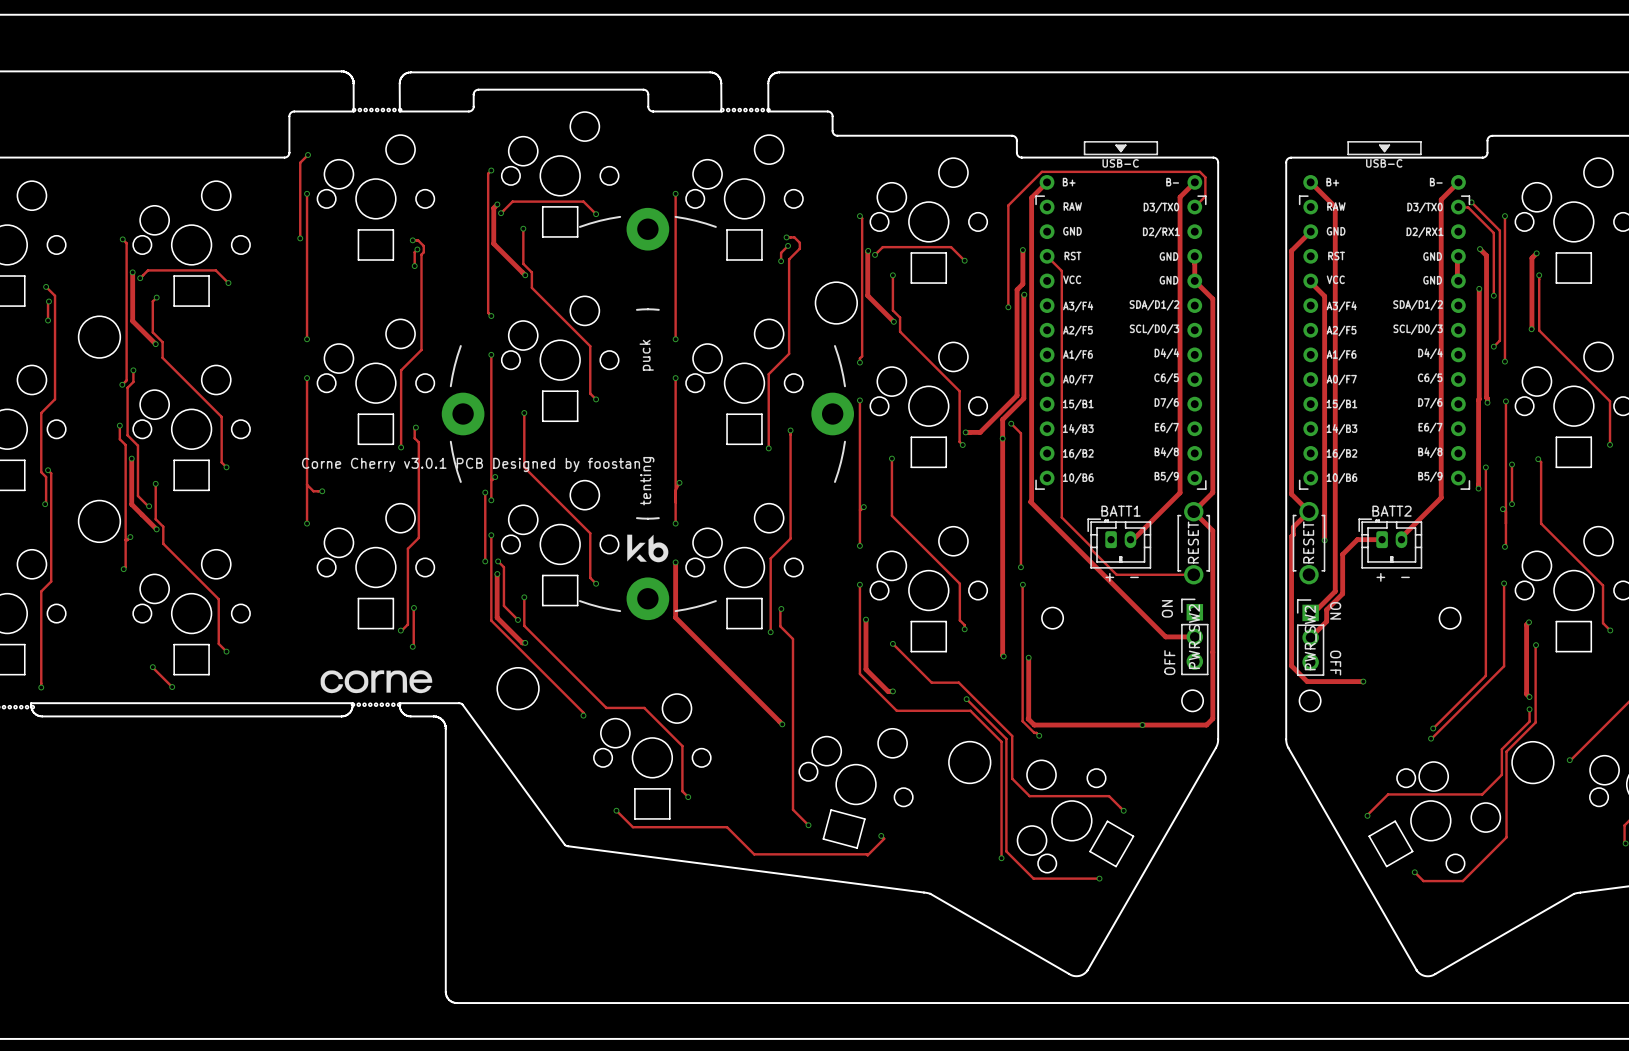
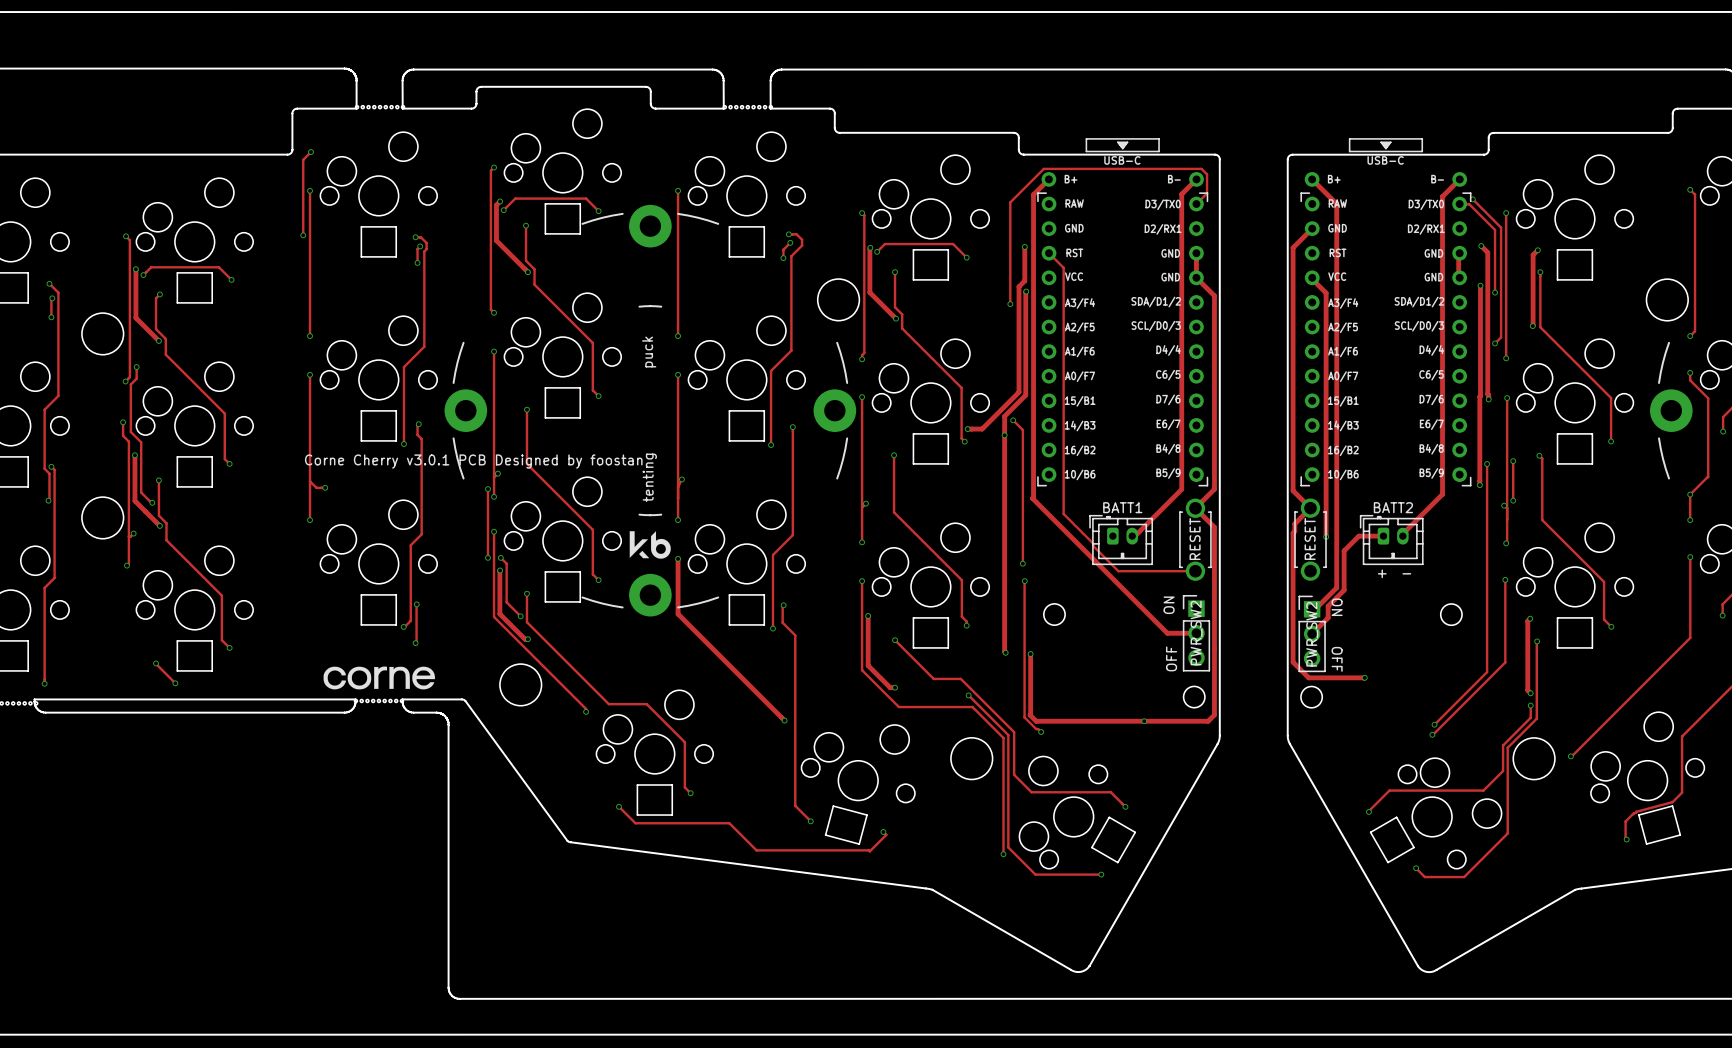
text: + (1109, 577) -> none
text: - (1134, 577) -> none

